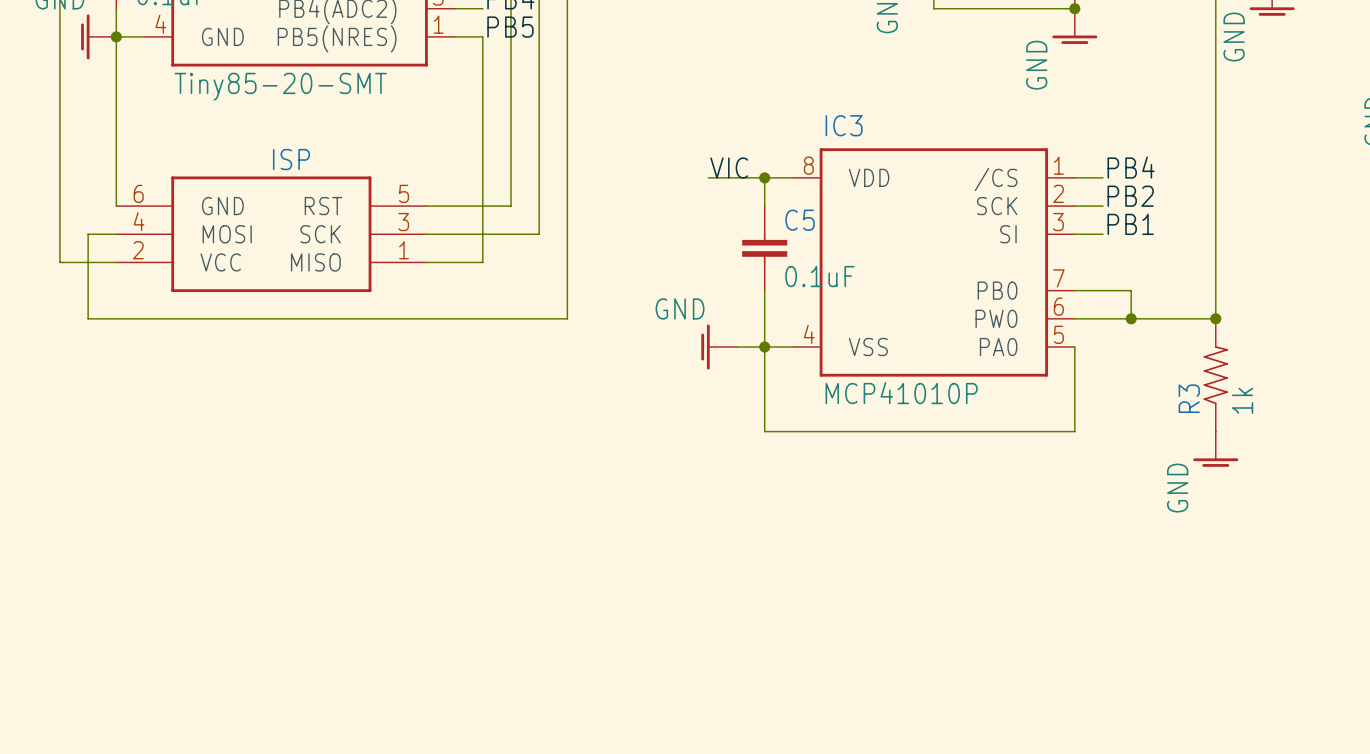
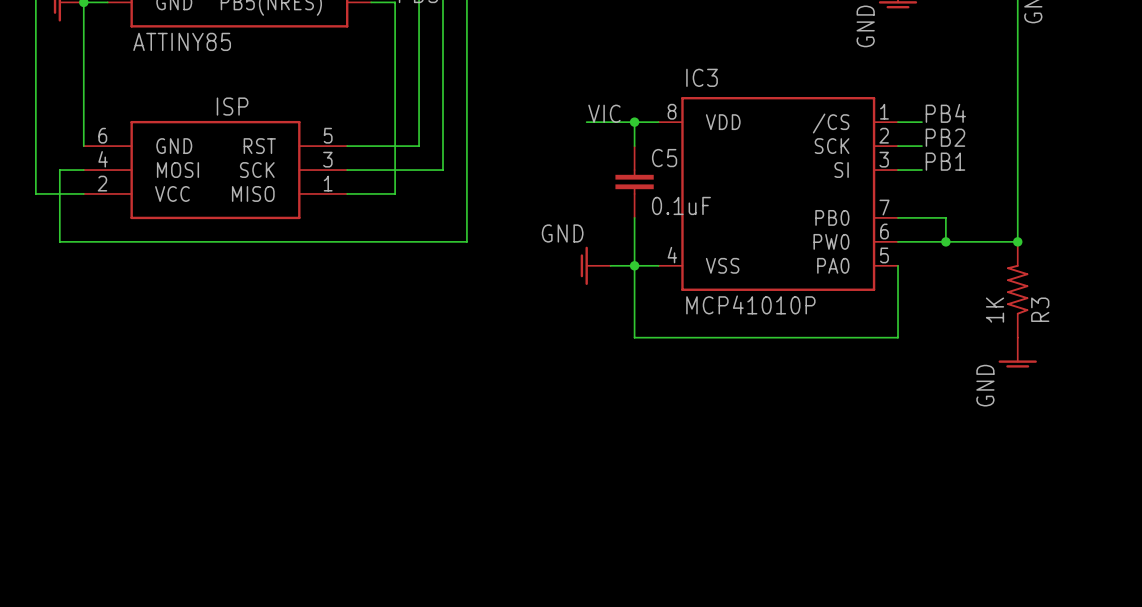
part value: Tiny85-20-SMT (280, 86) -> ATTINY85 (182, 41)
R3 symbol: [1203, 318, 1228, 432] -> [1007, 241, 1029, 338]
R3 name position: R3 (1189, 398) -> R3 (1040, 309)
R3 value: 1k (1242, 400) -> 1K (994, 310)

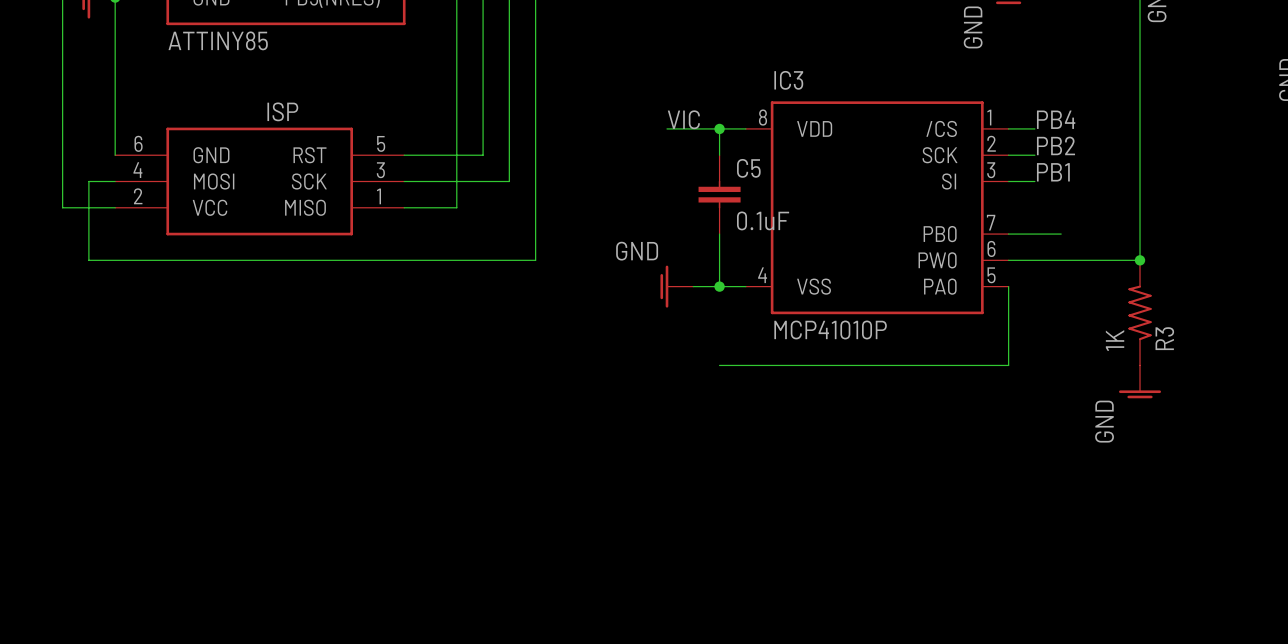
wire: (945, 217) (945, 241) -> none
junction: (945, 241) -> none
wire: (634, 265) (634, 337) -> none

